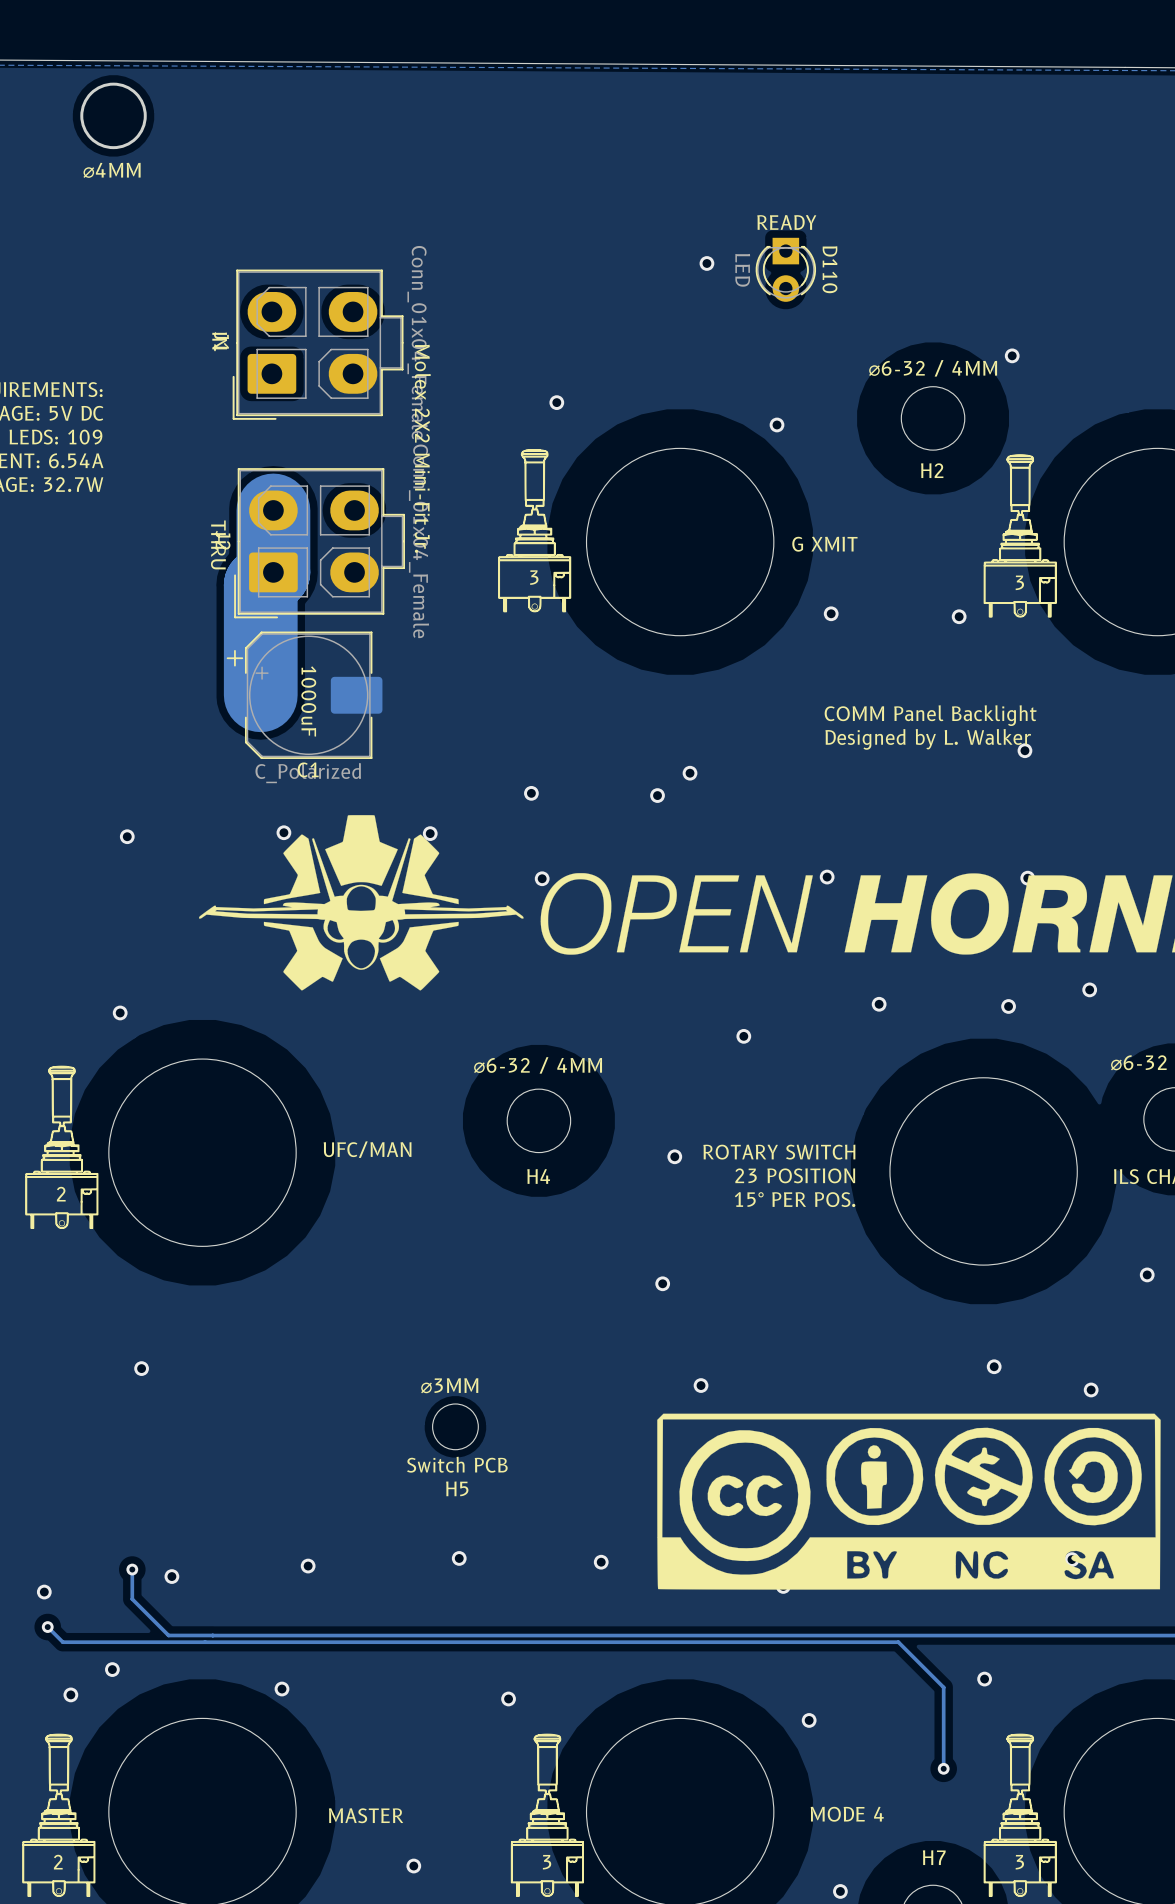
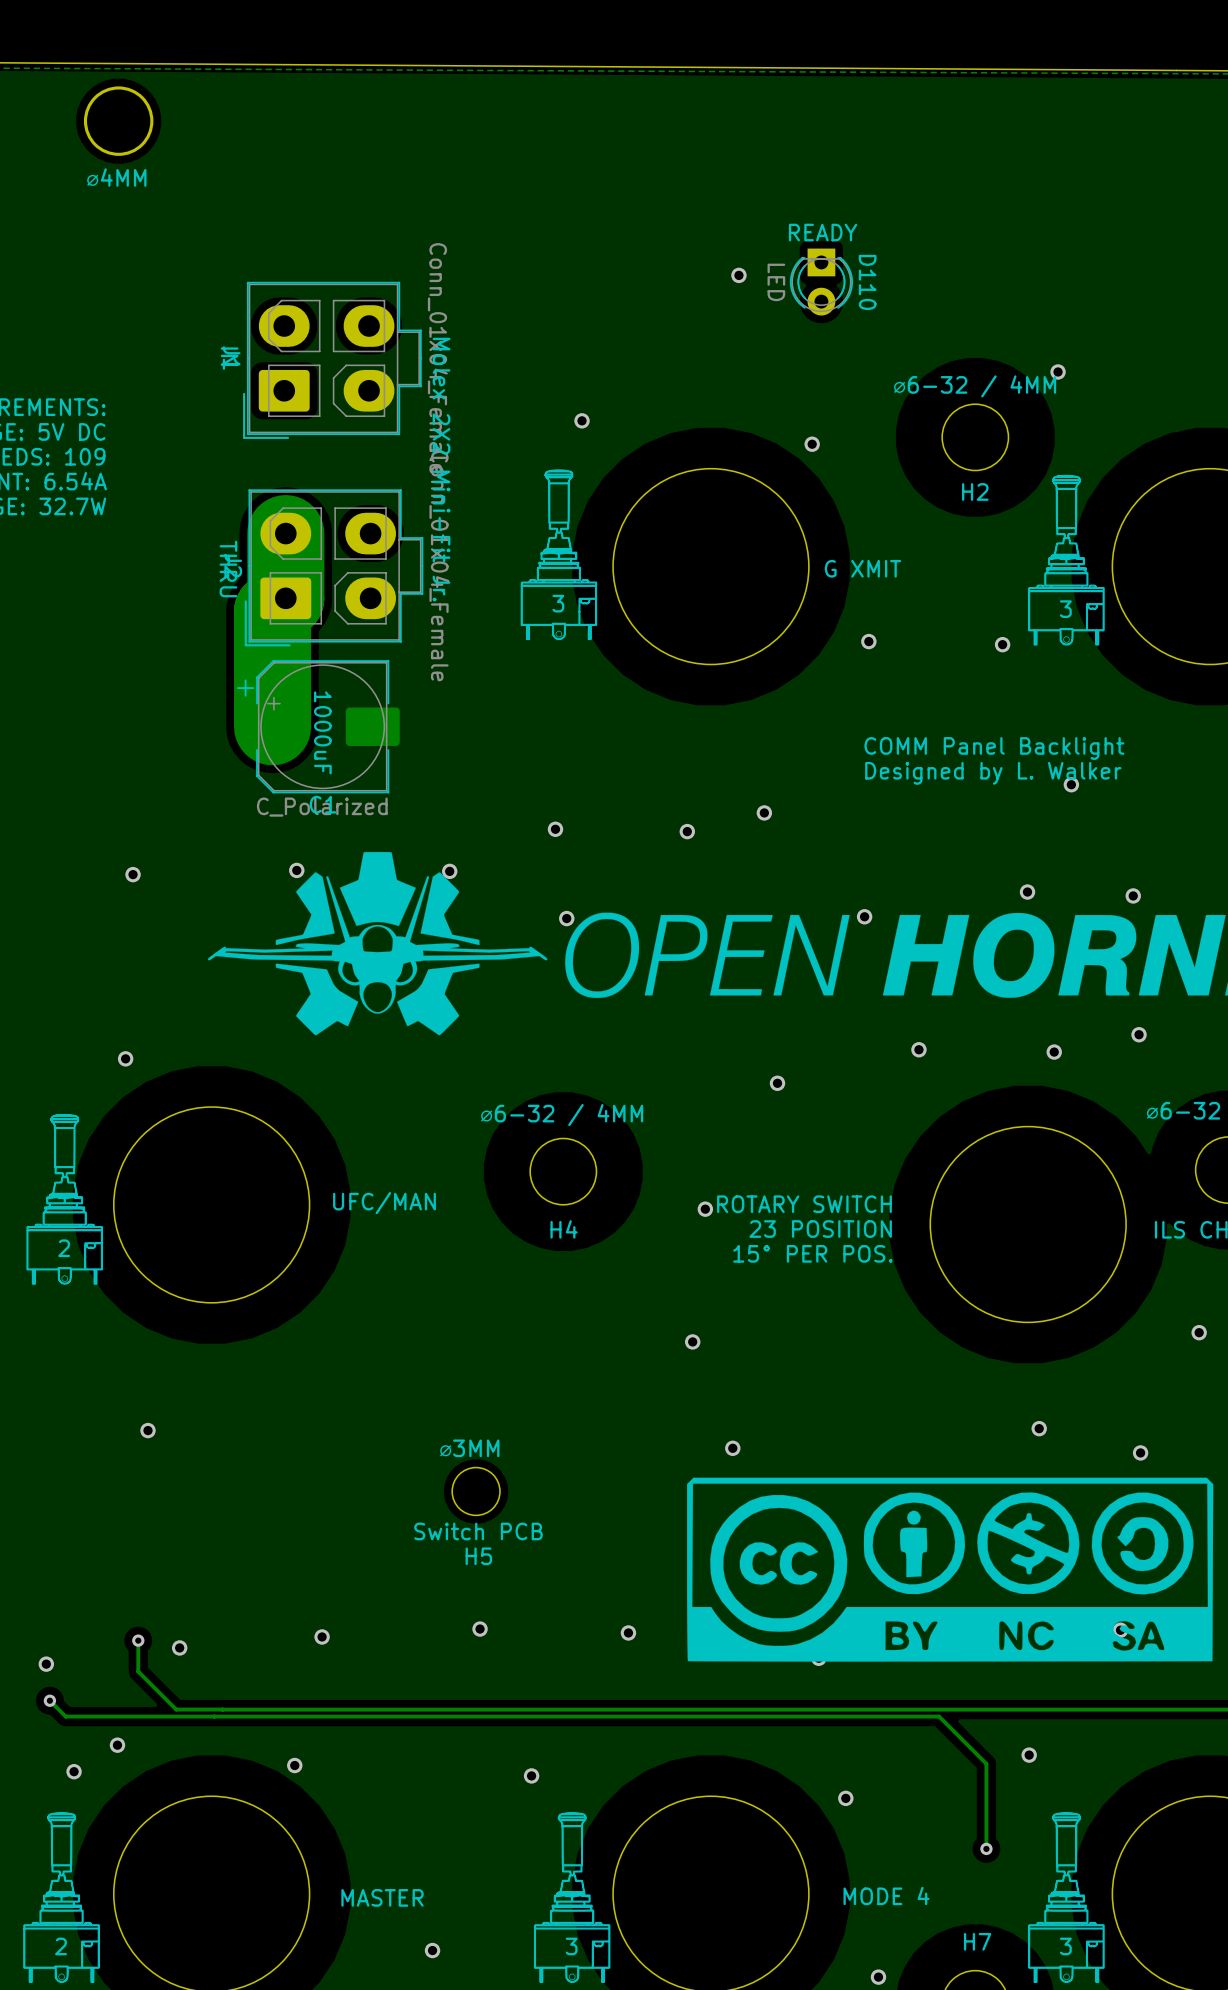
via position: (690, 773) -> (764, 812)
via: none -> (1027, 892)
via: none -> (1133, 895)
via: (1027, 878) -> none

